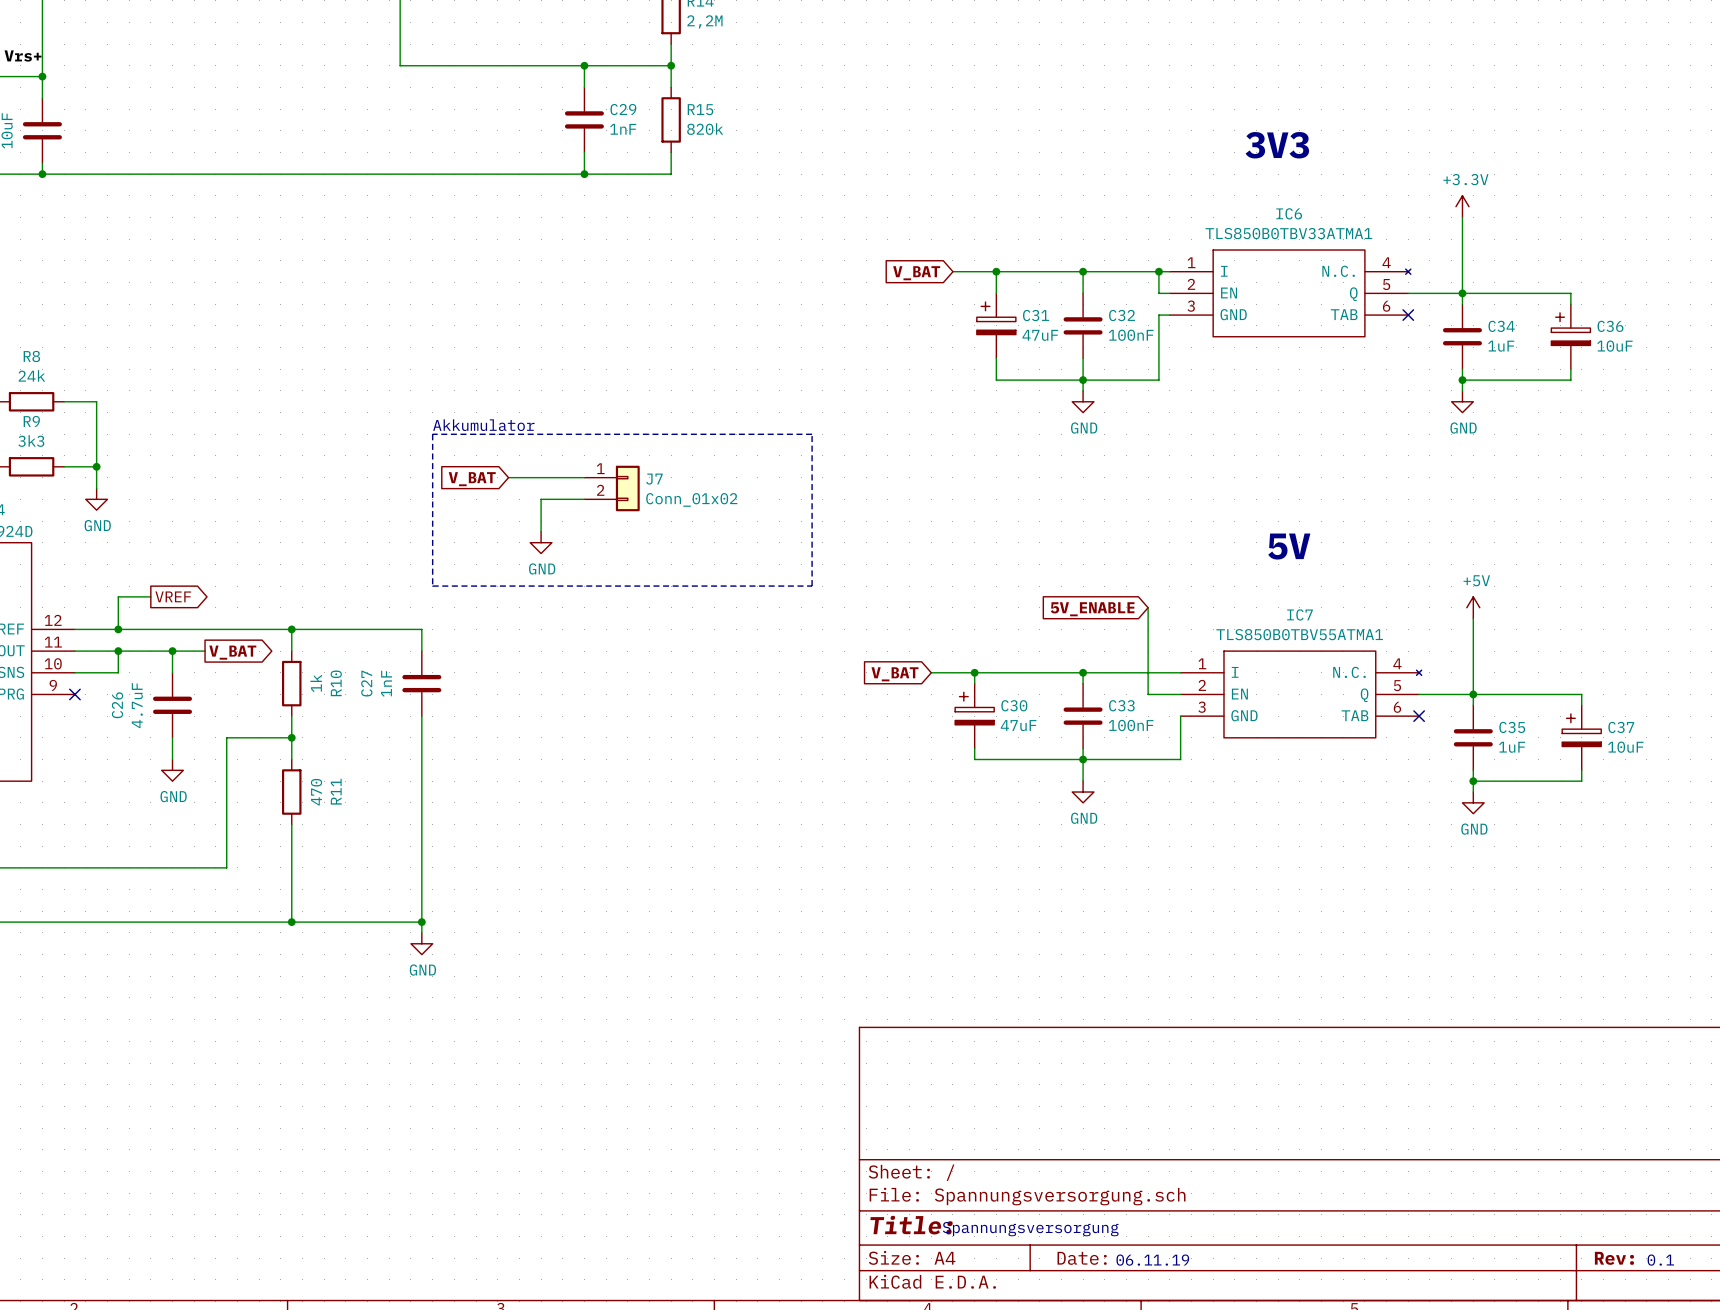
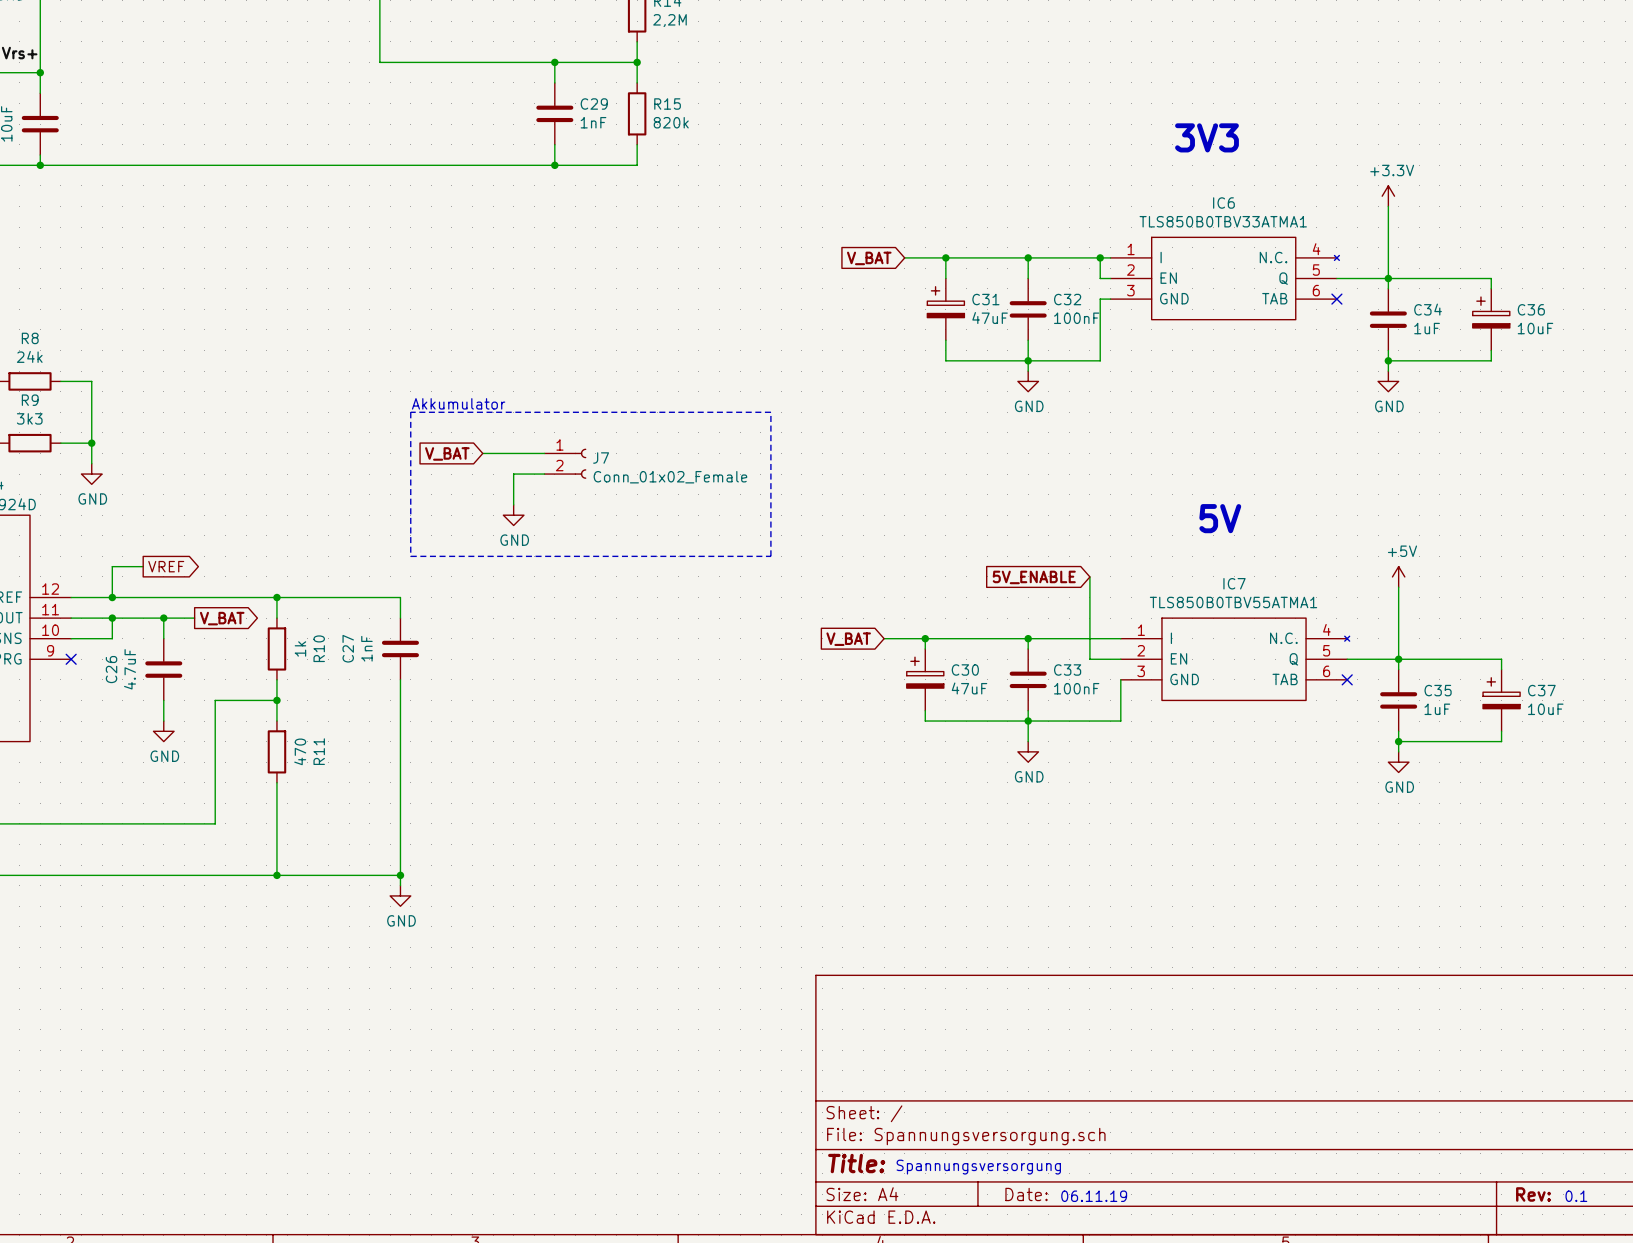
J7 symbol: [584, 465, 640, 512] -> [544, 448, 587, 479]
J7 value: Conn_01x02 (691, 499) -> Conn_01x02_Female (670, 477)

